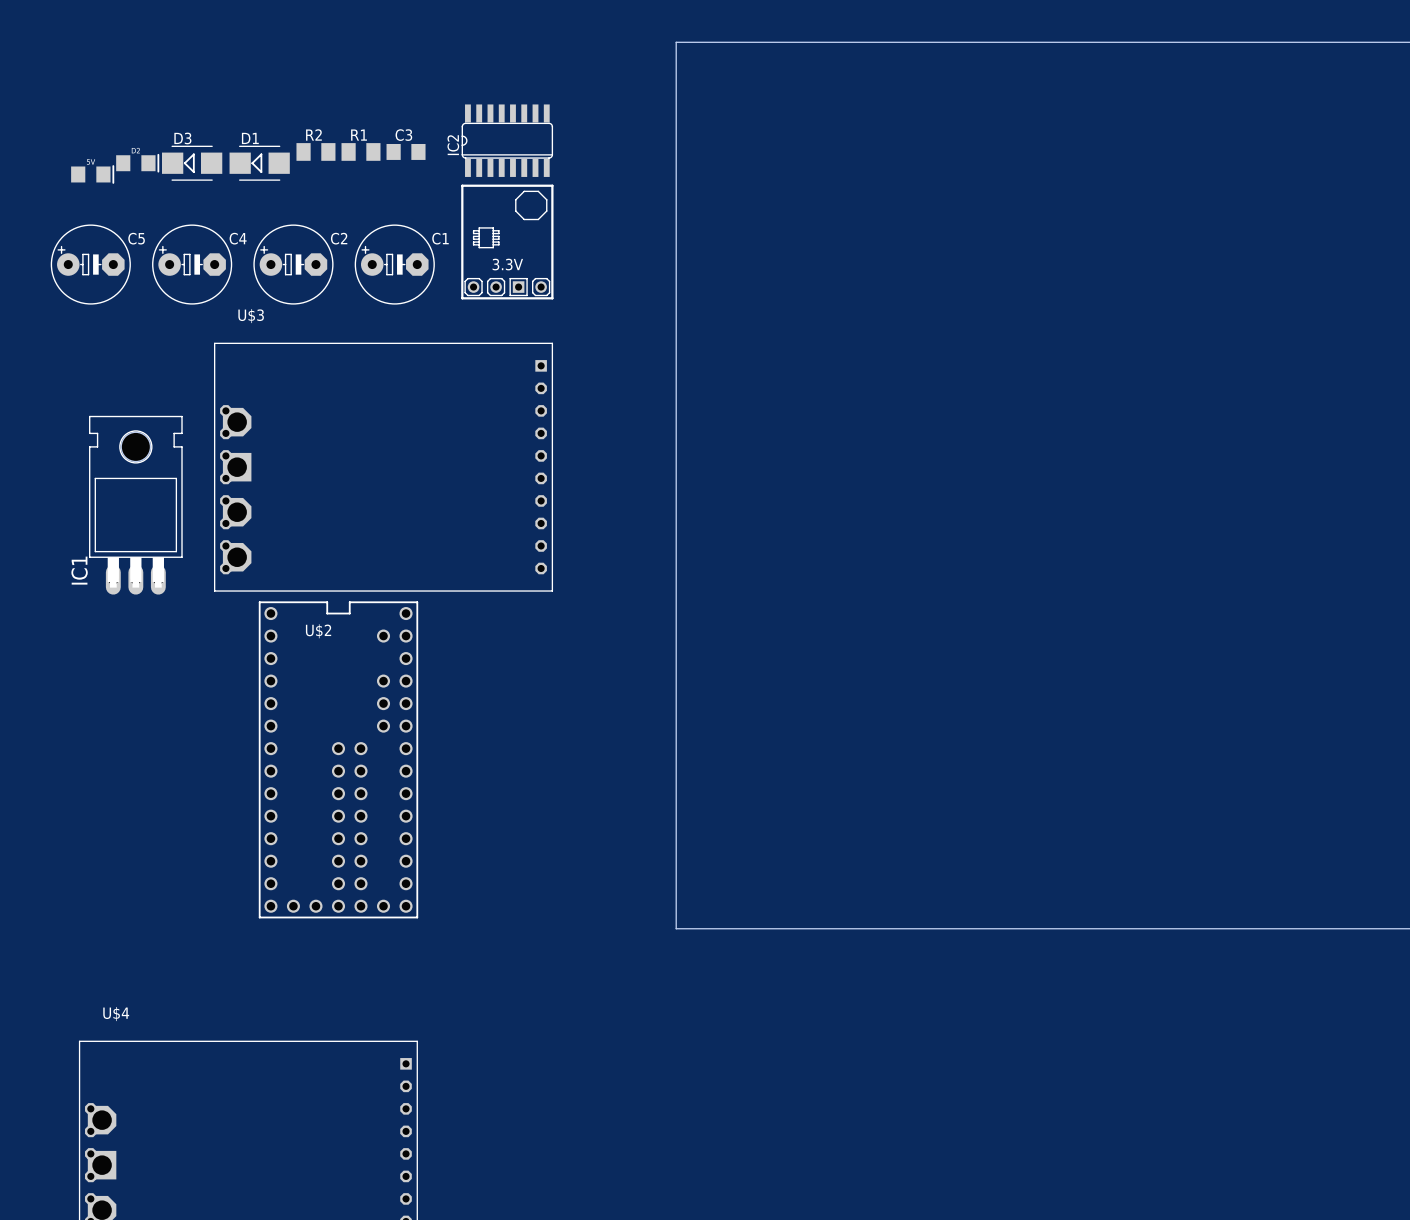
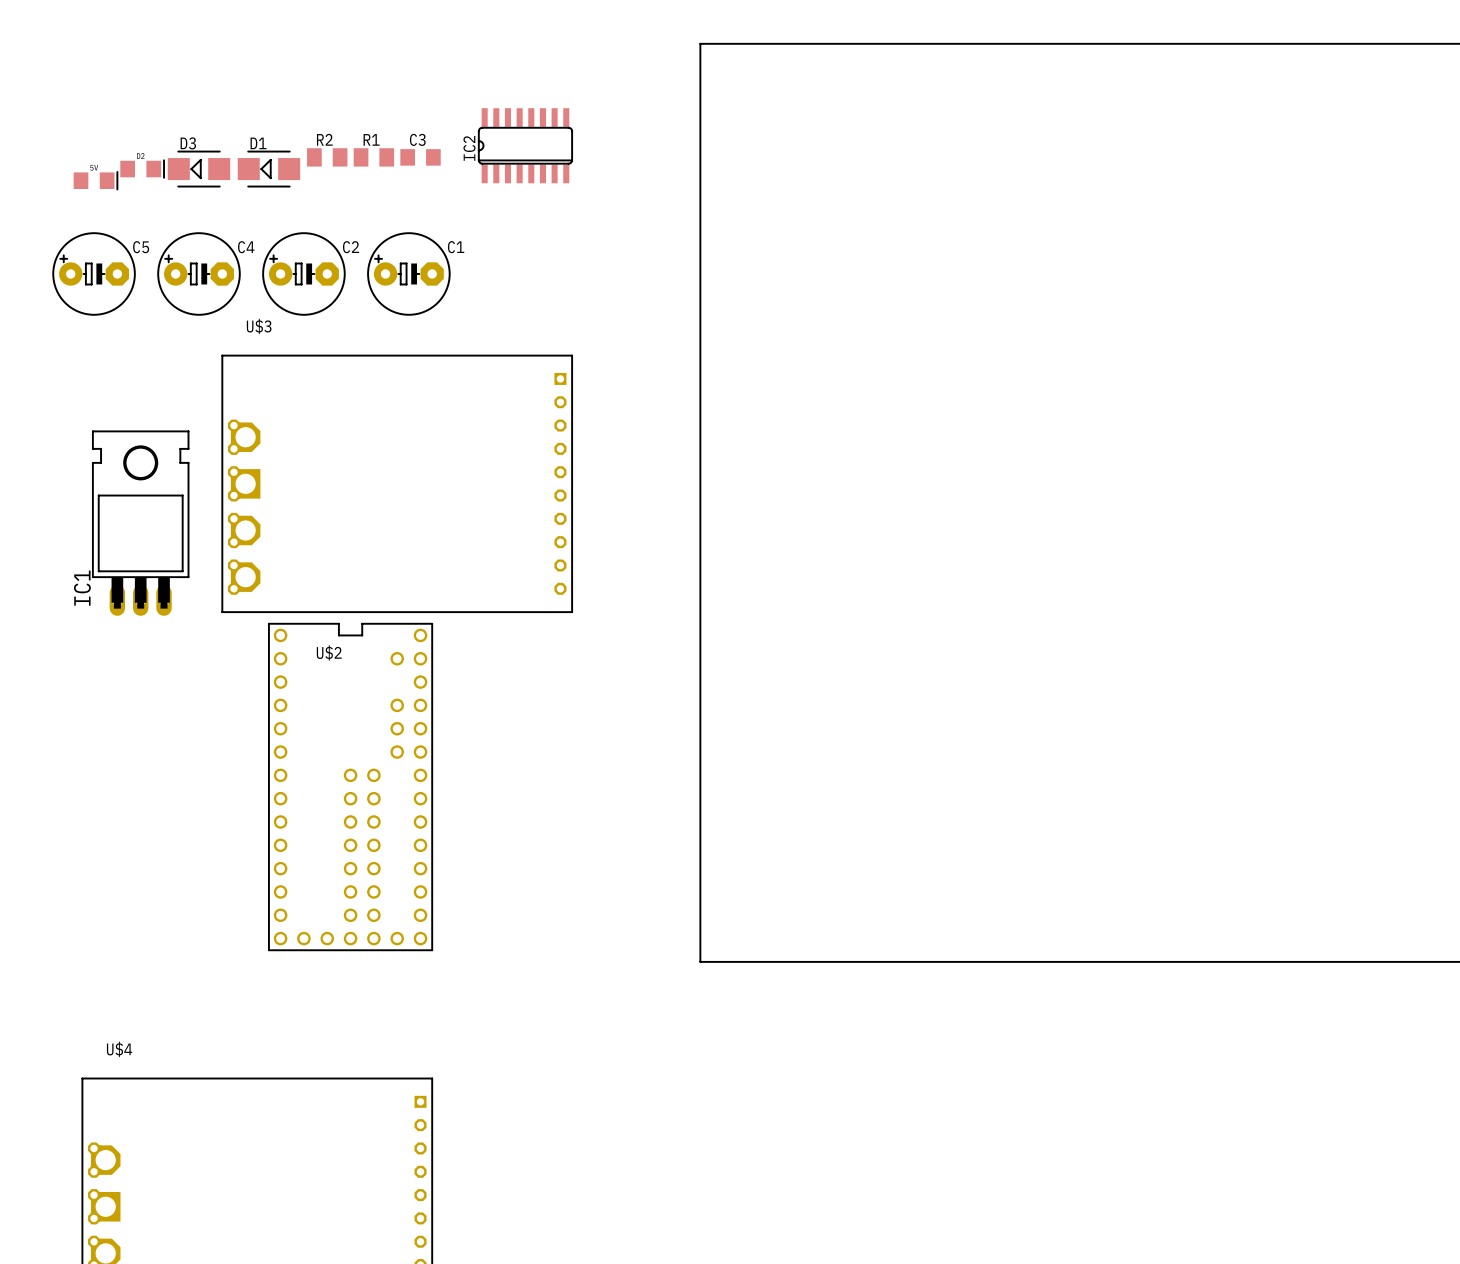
part: (507, 242) -> none

